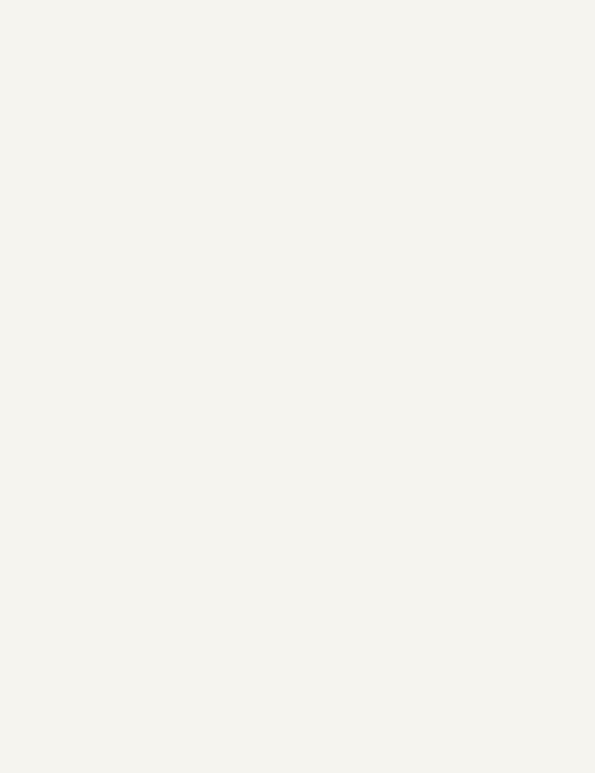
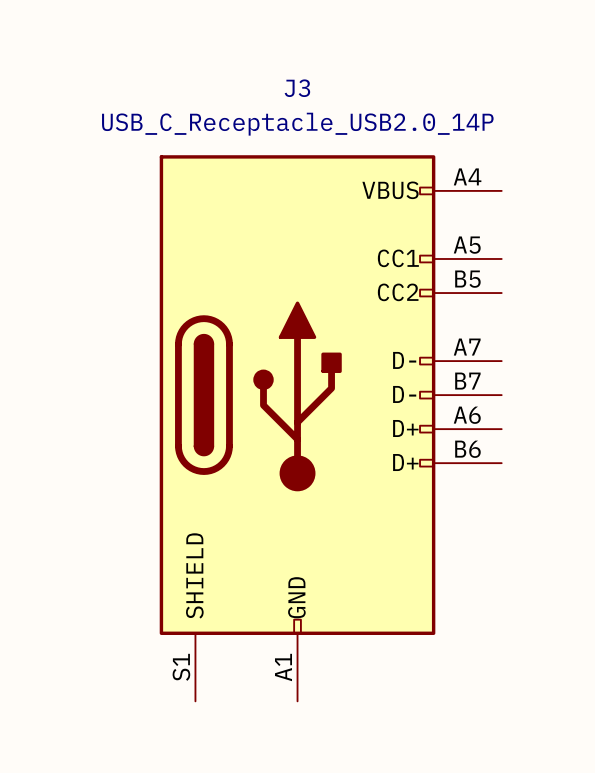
J3: none -> USB_C_Receptacle_USB2.0_14P (330, 428)

